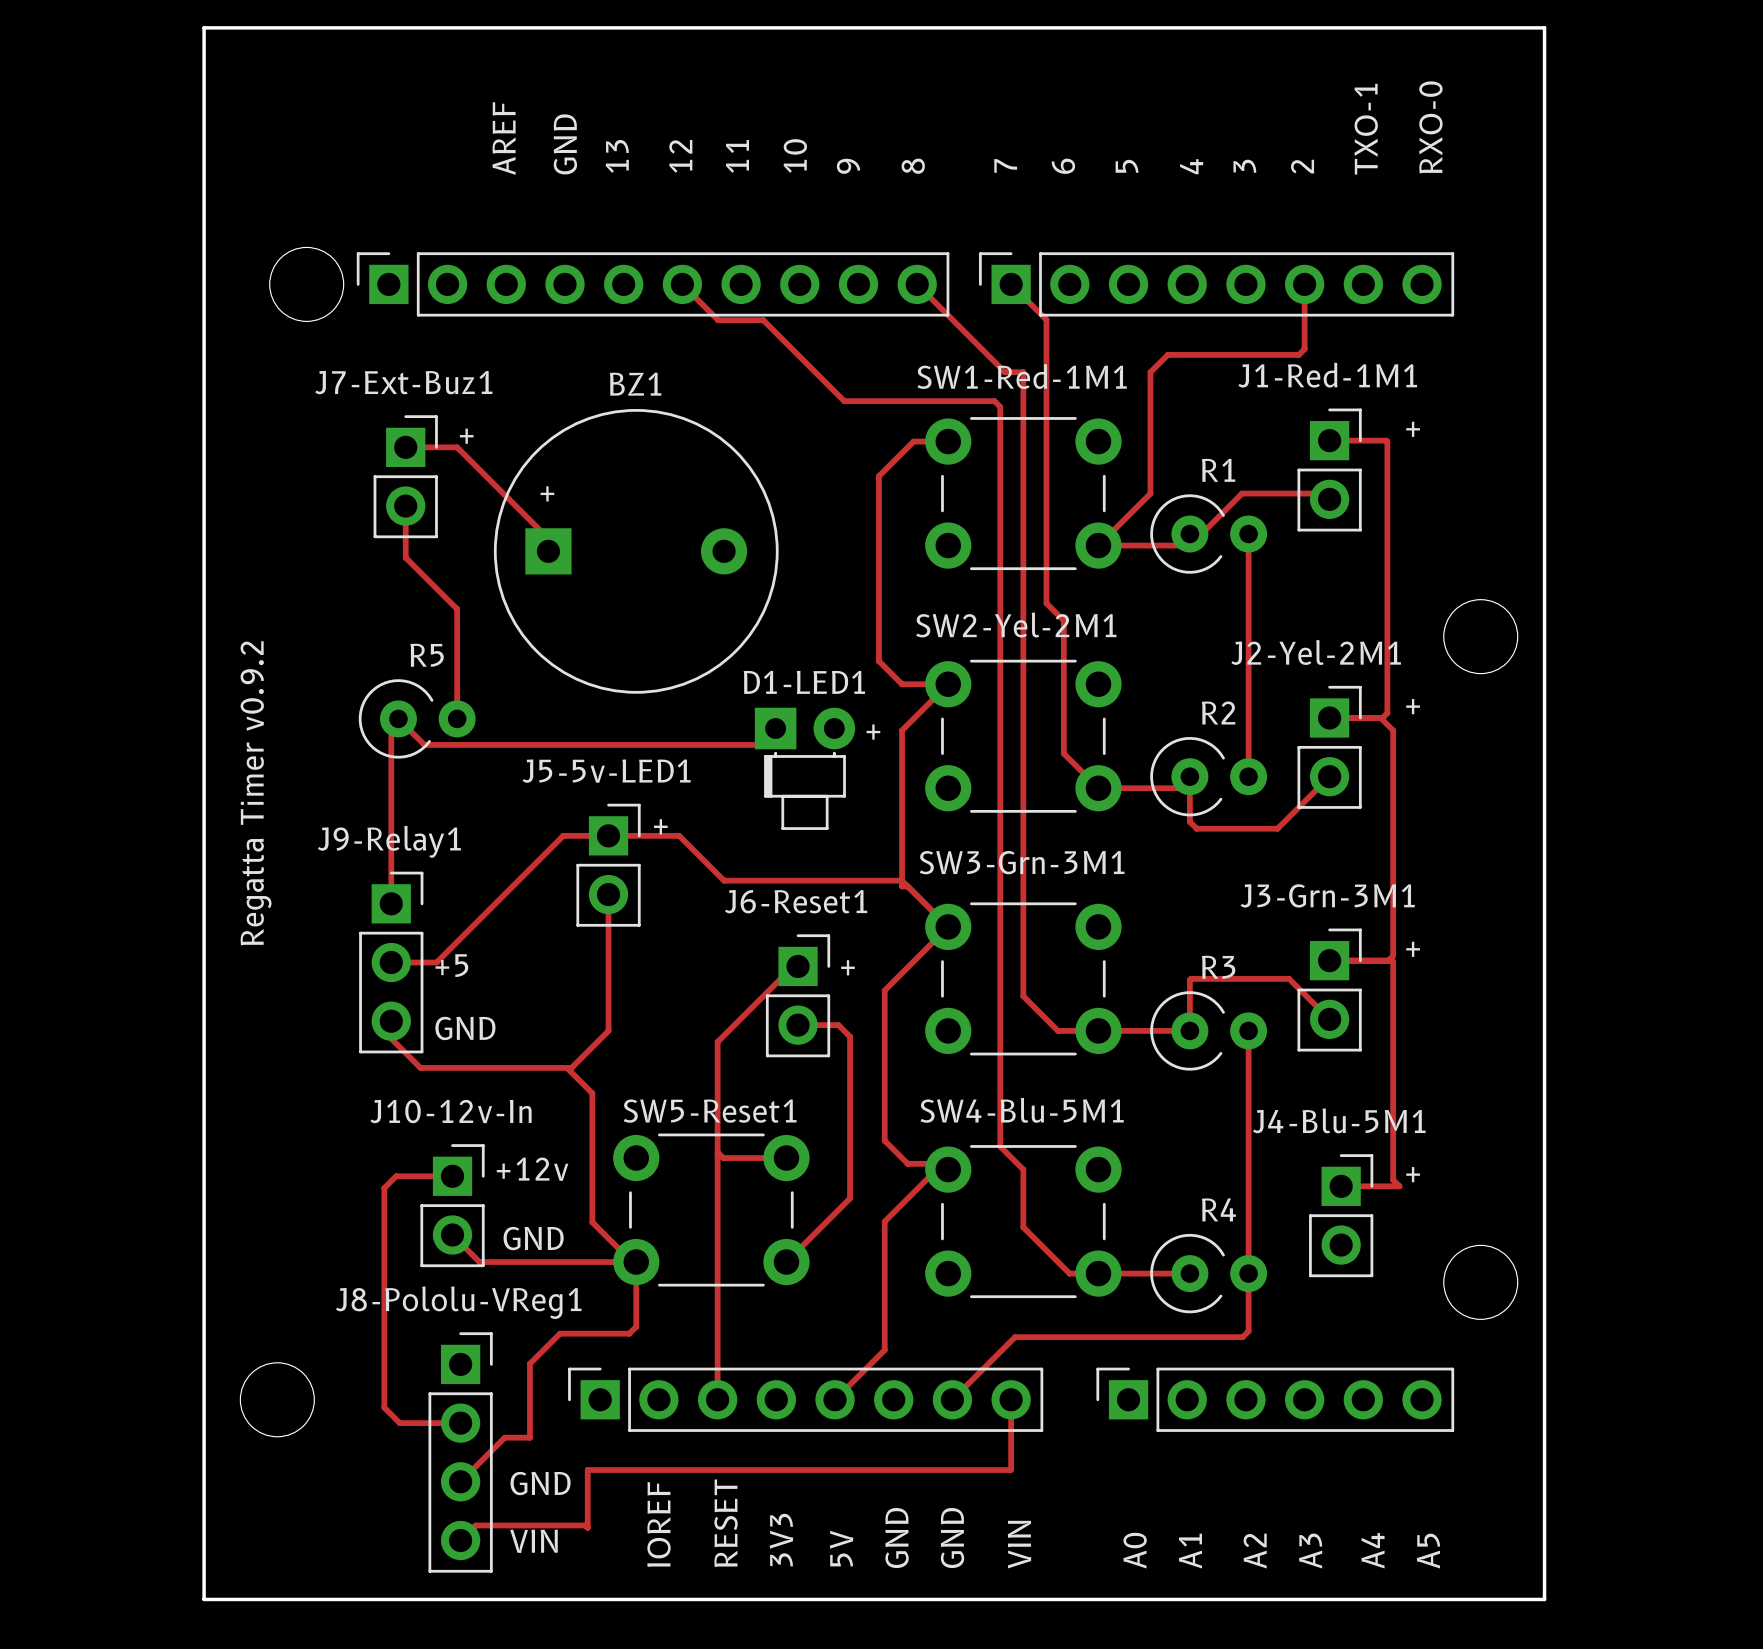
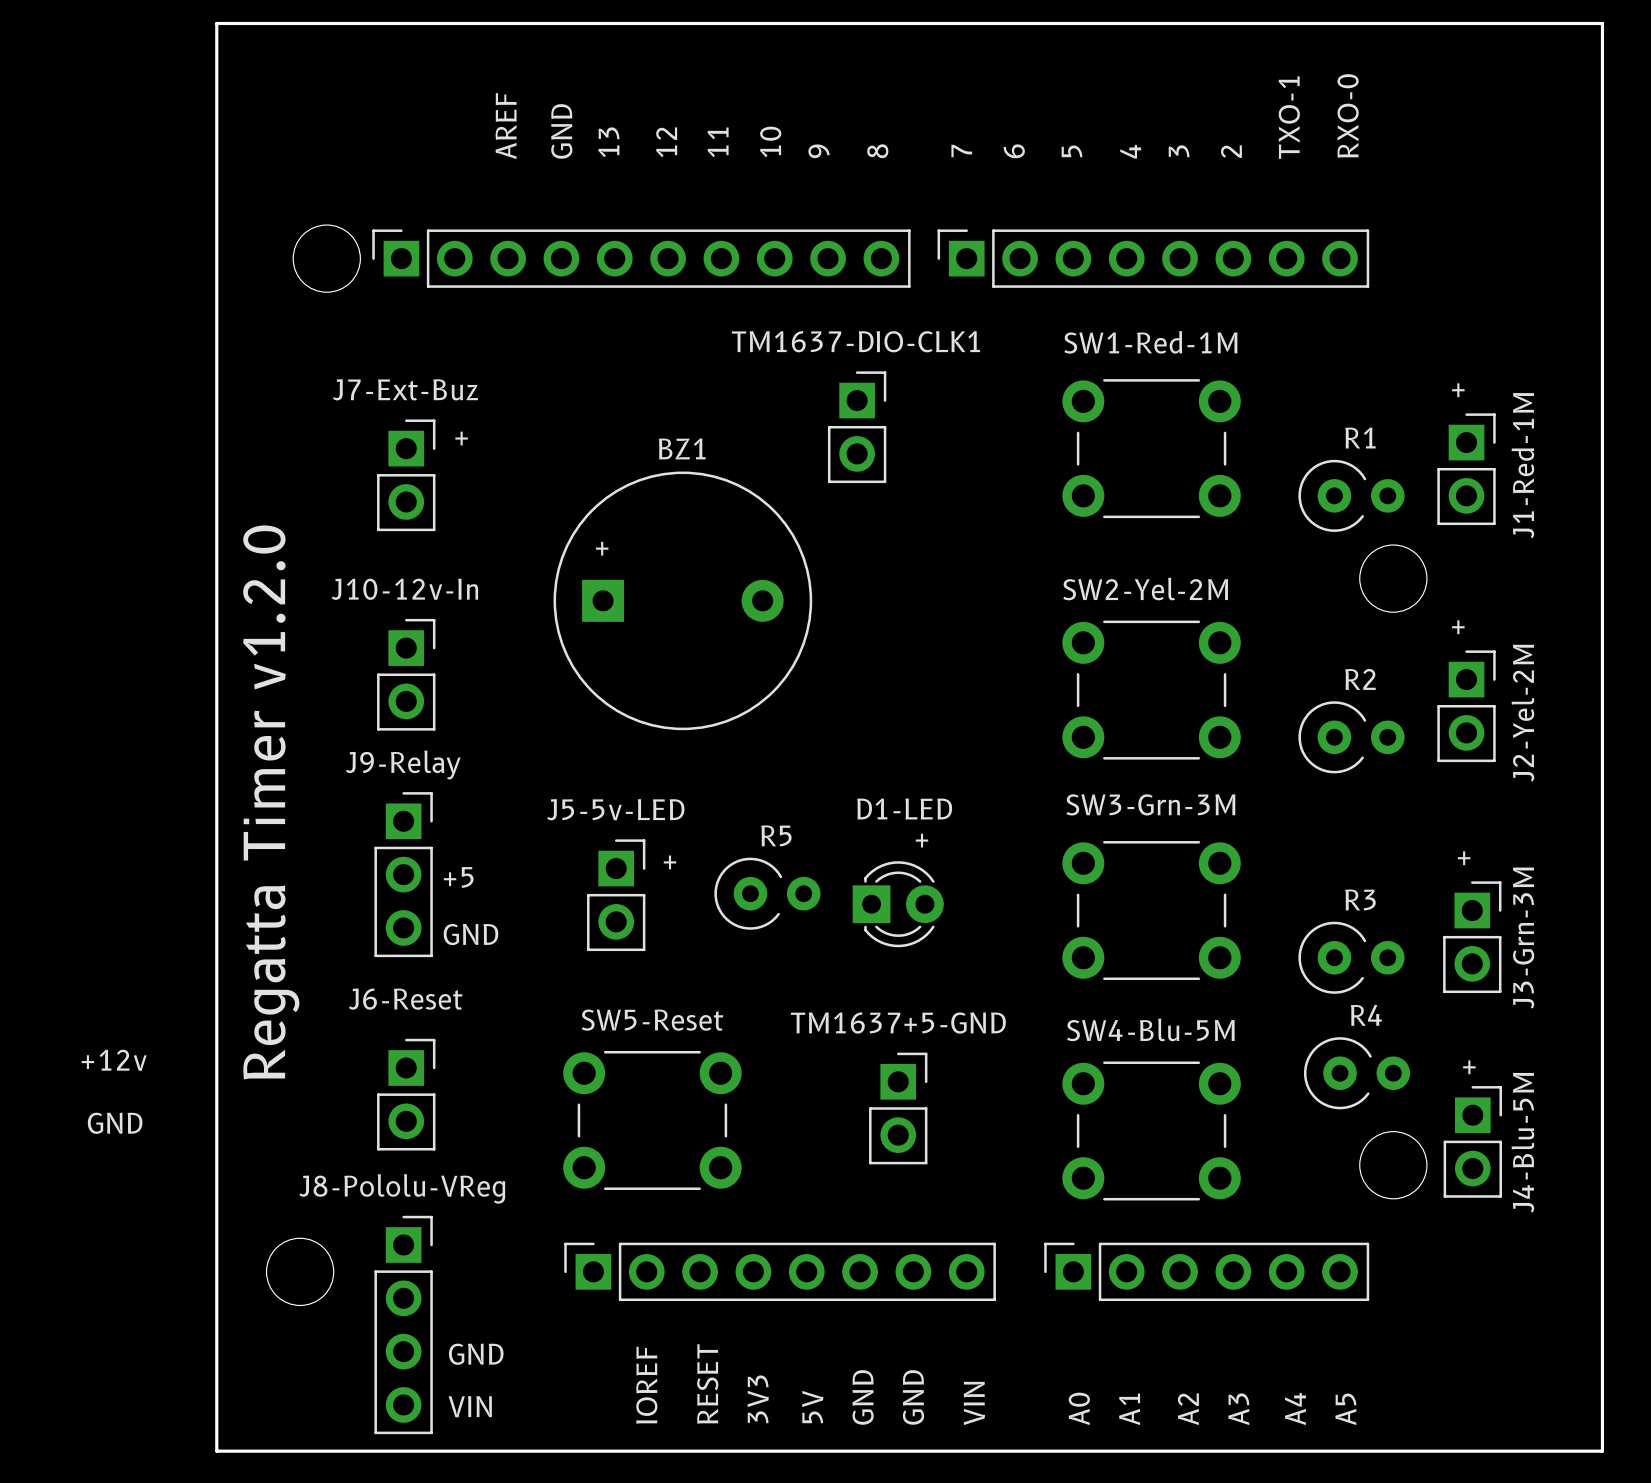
board edge: (204, 27) (1544, 27) (1544, 1599) (204, 1599) (204, 27) -> (216, 23) (216, 1451) (1602, 1451) (1602, 23) (216, 23)
track: (682, 284) (718, 320) (763, 320) (844, 401) (994, 401) (1000, 406) (1000, 1146) (1023, 1169) (1023, 1227) (1069, 1273) (1189, 1273) -> none
track: (917, 284) (1005, 372) (1023, 372) (1023, 996) (1058, 1030) (1189, 1030) (1190, 978) (1289, 978) (1329, 1019) -> none
track: (1011, 284) (1046, 319) (1046, 603) (1063, 620) (1063, 753) (1098, 788) (1189, 788) -> none
track: (1304, 284) (1304, 349) (1298, 354) (1167, 354) (1150, 372) (1150, 493) (1098, 545) (1196, 545) -> none
text position: + (1413, 429) -> + (1458, 390)
text position: + (466, 436) -> + (461, 438)
track: (1346, 440) (1387, 441) (1387, 713) (1382, 717) (1329, 717) -> none
track: (948, 441) (913, 441) (878, 476) (878, 661) (902, 684) (948, 684) (902, 730) (902, 886) (907, 886) -> none
track: (405, 447) (457, 447) (548, 538) -> none
TM1637-DIO-CLK1: none -> (857, 427)
J1-Red-1M1: (1329, 470) -> none
J7-Ext-Buz1: (405, 476) -> none
SW1-Red-1M1: (1023, 493) -> none
SW1-Red-1M: none -> (1151, 448)
track: (1341, 493) (1242, 493) (1201, 534) -> none
track: (405, 506) (405, 557) (457, 609) (457, 718) -> none
J1-Red-1M: none -> (1466, 469)
J7-Ext-Buz: none -> (406, 475)
R1 position: (1208, 534) -> (1351, 495)
track: (1248, 545) (1248, 776) -> none
BZ1 position: (636, 551) -> (682, 600)
text: none -> + (1458, 627)
text: + (1413, 706) -> none
track: (1380, 717) (1393, 730) (1393, 955) (1388, 960) -> none
track: (398, 718) (424, 744) (759, 744) (775, 728) -> none
R5 position: (417, 718) -> (767, 893)
track: (391, 726) (391, 903) -> none
text: + (873, 732) -> none
SW2-Yel-2M1: (1023, 736) -> none
J2-Yel-2M1: (1329, 747) -> none
SW2-Yel-2M: none -> (1151, 690)
D1-LED1: (804, 768) -> none
track: (1189, 776) (1189, 821) (1196, 828) (1277, 828) (1329, 776) -> none
R2 position: (1208, 776) -> (1351, 737)
J2-Yel-2M: none -> (1466, 706)
text: Regatta Timer v0.9.2 (256, 793) -> Regatta Timer v1.2.0 (271, 802)
text: + (660, 826) -> none
J9-Relay1 name: J9-Relay1 (389, 841) -> J9-Relay (403, 764)
J5-5v-LED1: (608, 865) -> none
track: (608, 894) (608, 1030) (571, 1067) (420, 1067) (391, 1038) (391, 1021) -> none
text: none -> + (922, 840)
text: none -> + (1464, 858)
text: none -> + (669, 862)
text: + (1413, 949) -> none
track: (1329, 960) (1393, 961) (1393, 1179) (1399, 1186) (1341, 1186) -> none
track: (391, 962) (436, 962) (563, 835) (679, 835) (724, 880) (902, 880) (948, 926) (884, 990) (884, 1140) (907, 1163) (942, 1163) -> none
track: (792, 967) (717, 1042) (717, 1399) -> none
text: + (848, 967) -> none
SW3-Grn-3M1: (1023, 978) -> none
J5-5v-LED: none -> (616, 895)
J3-Grn-3M1: (1329, 990) -> none
J6-Reset1: (798, 995) -> none
D1-LED: none -> (898, 904)
SW3-Grn-3M: none -> (1151, 910)
track: (798, 1025) (838, 1025) (850, 1036) (850, 1198) (786, 1262) -> none
R3 position: (1208, 1030) -> (1351, 957)
track: (1248, 1030) (1248, 1331) (1242, 1337) (1015, 1337) (952, 1399) -> none
J3-Grn-3M: none -> (1472, 937)
track: (566, 1067) (592, 1093) (592, 1222) (632, 1262) -> none
track: (717, 1152) (723, 1158) (786, 1158) -> none
text position: +12v (532, 1169) -> +12v (114, 1060)
track: (936, 1169) (884, 1221) (884, 1350) (835, 1399) -> none
text: + (1413, 1174) -> none
text: none -> + (1469, 1067)
track: (452, 1176) (396, 1176) (384, 1188) (384, 1407) (399, 1423) (460, 1423) -> none
J6-Reset: none -> (406, 1094)
J10-12v-In position: (452, 1205) -> (406, 674)
SW5-Reset1: (711, 1210) -> none
J4-Blu-5M1: (1341, 1215) -> none
TM1637+5-GND: none -> (898, 1108)
SW4-Blu-5M1: (1023, 1221) -> none
SW5-Reset: none -> (652, 1120)
track: (452, 1234) (479, 1262) (636, 1262) (636, 1326) (629, 1333) (559, 1333) (529, 1363) (529, 1437) (504, 1437) (460, 1481) -> none
text: none -> GND (115, 1123)
text: GND (533, 1238) -> none
SW4-Blu-5M: none -> (1151, 1130)
J4-Blu-5M: none -> (1472, 1141)
R4 position: (1208, 1273) -> (1357, 1073)
track: (1011, 1399) (1010, 1470) (587, 1470) (587, 1527) (585, 1525) (475, 1525) (460, 1540) -> none
J8-Pololu-VReg1: (460, 1452) -> none
J8-Pololu-VReg: none -> (403, 1324)
text position: GND (540, 1483) -> GND (476, 1354)
text position: VIN (533, 1541) -> VIN (470, 1406)

